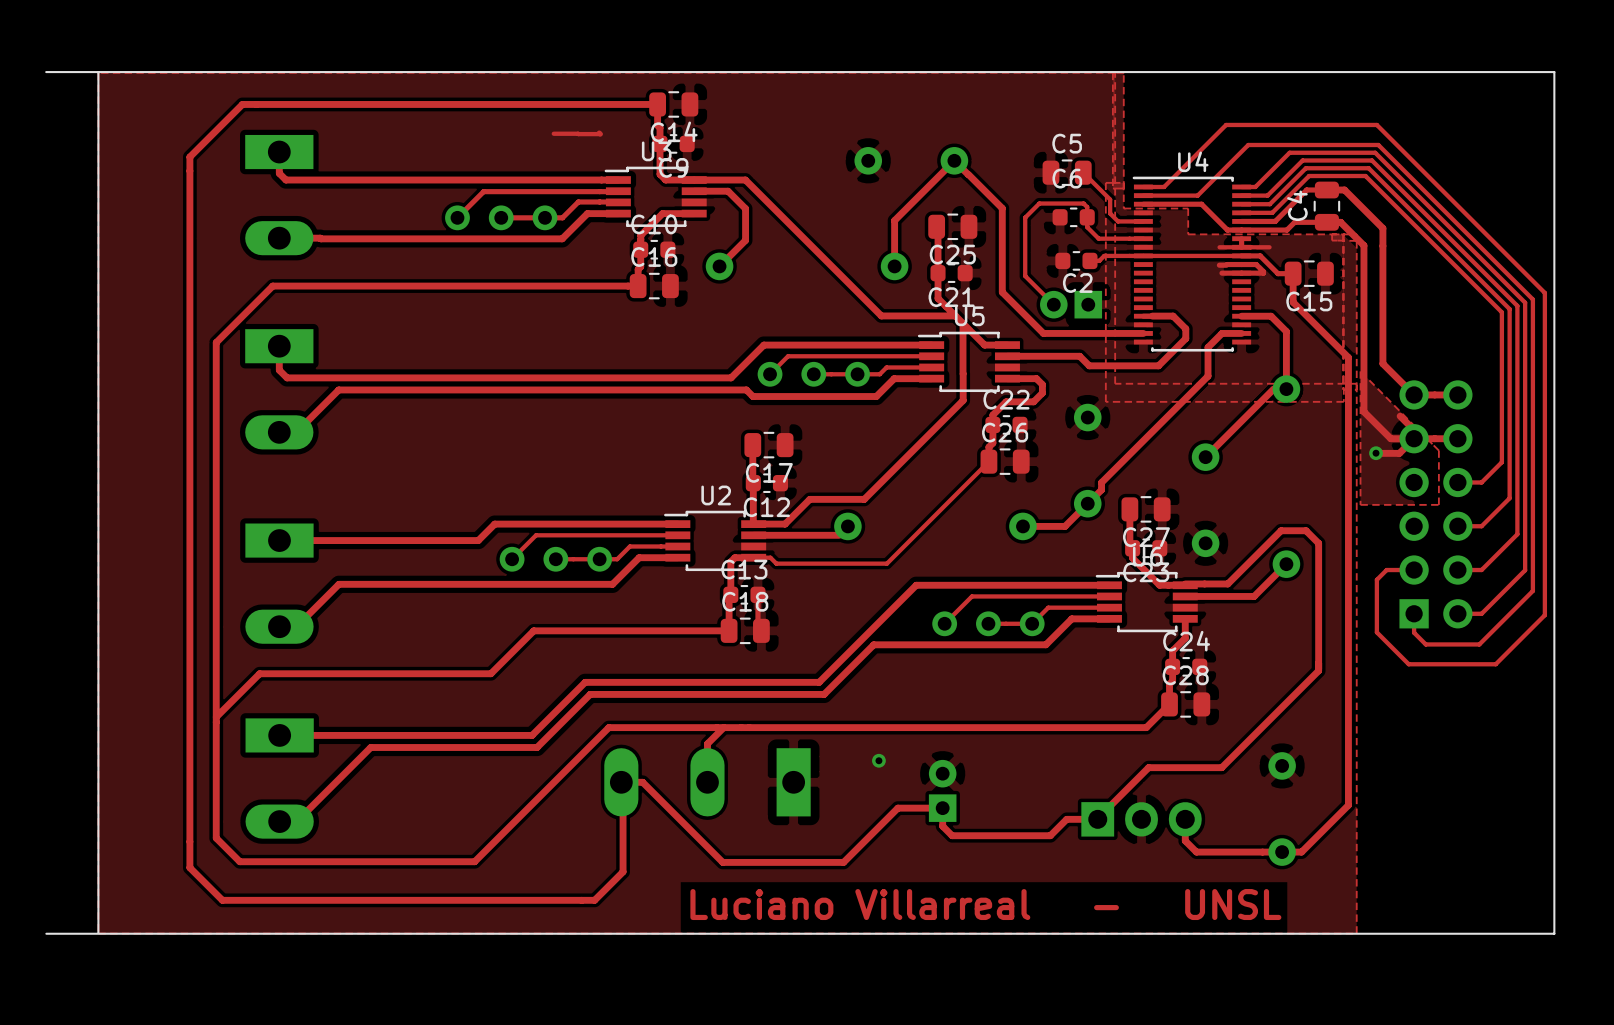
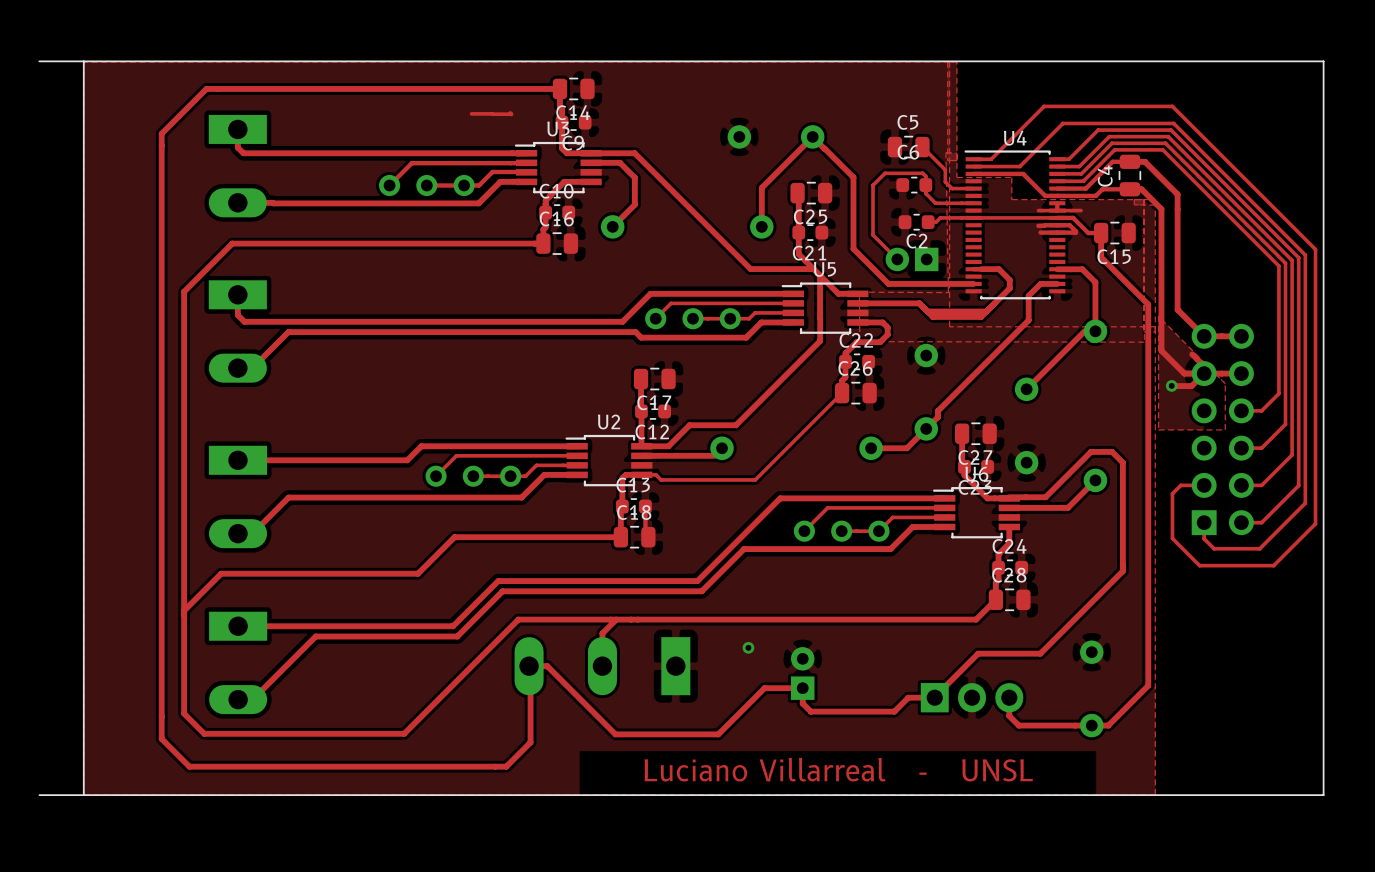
zone outline: (1123, 182) (1105, 182) (1105, 401) (1343, 401) -> (956, 153) (945, 152) (948, 292) (859, 292) (859, 341) (1144, 342)
track: none -> (919, 303) (932, 316) (981, 316) (986, 311)

